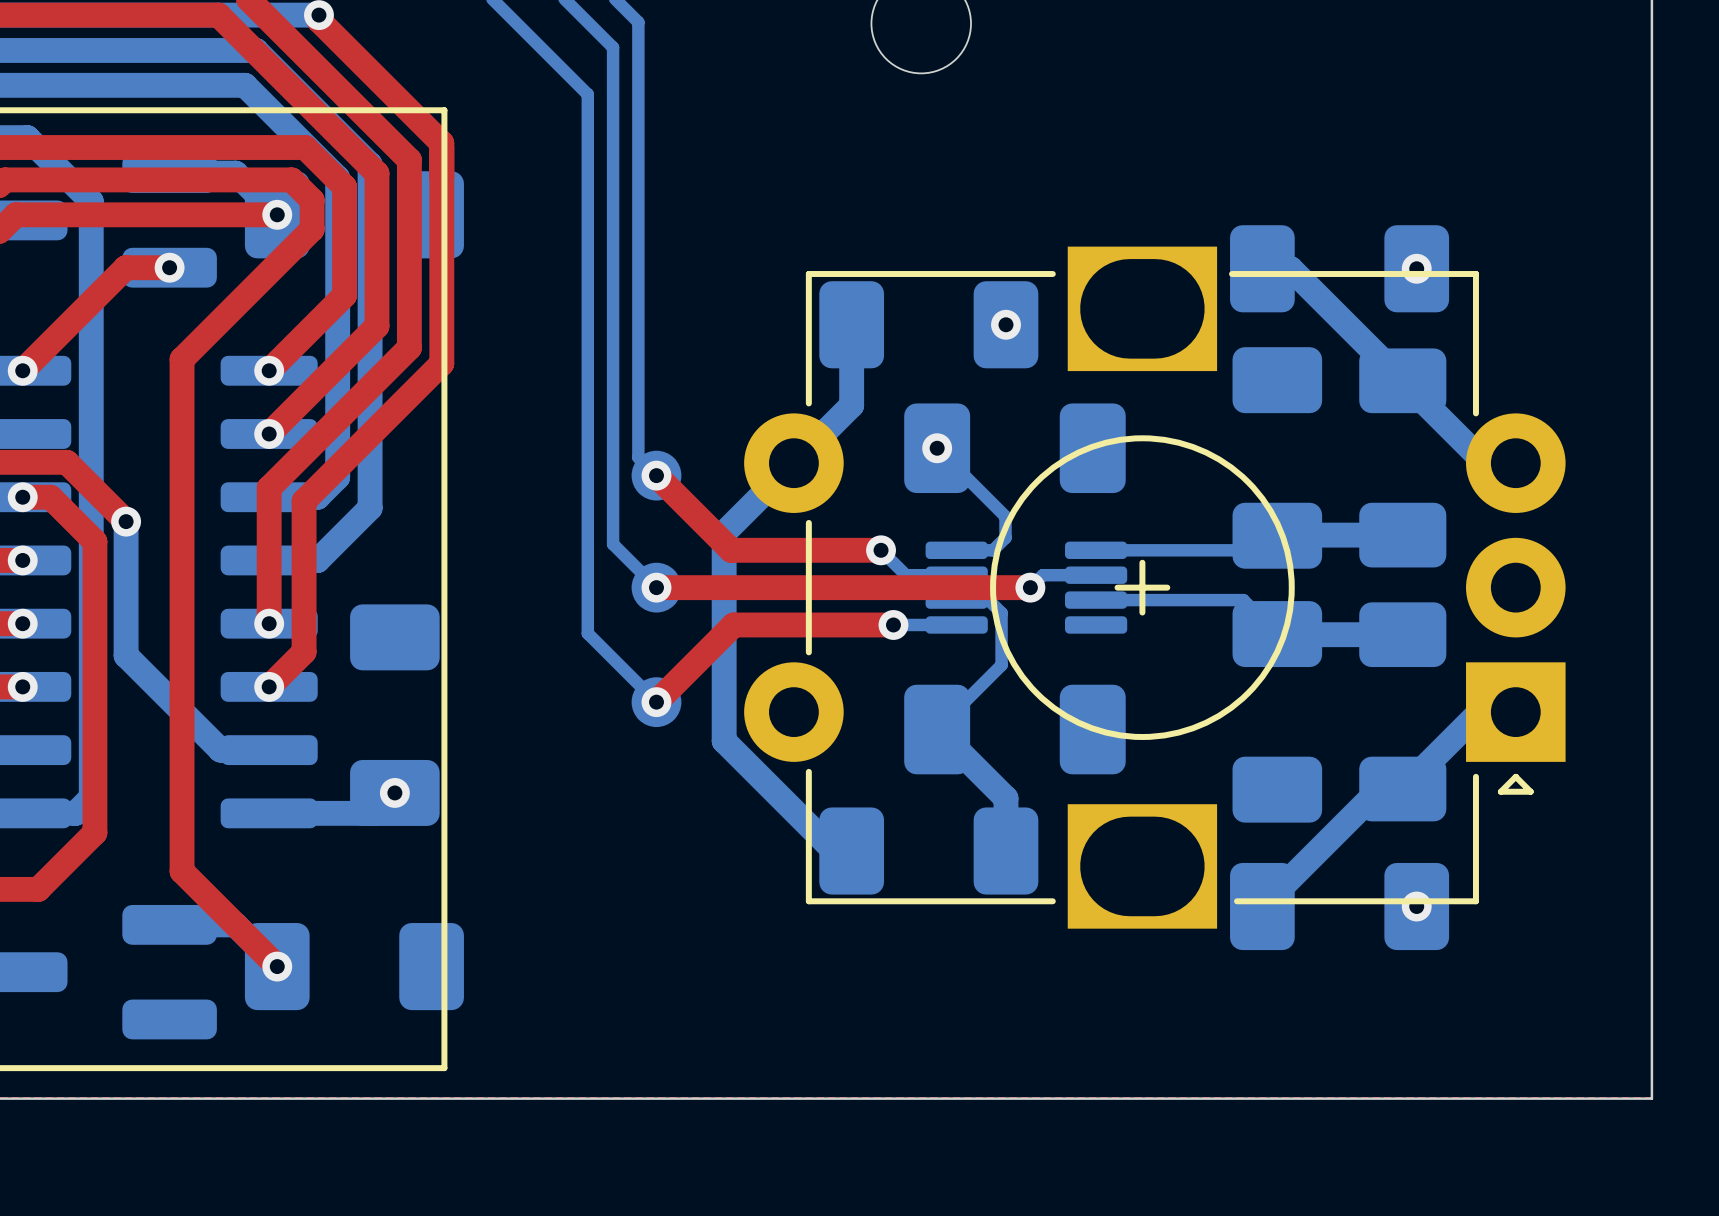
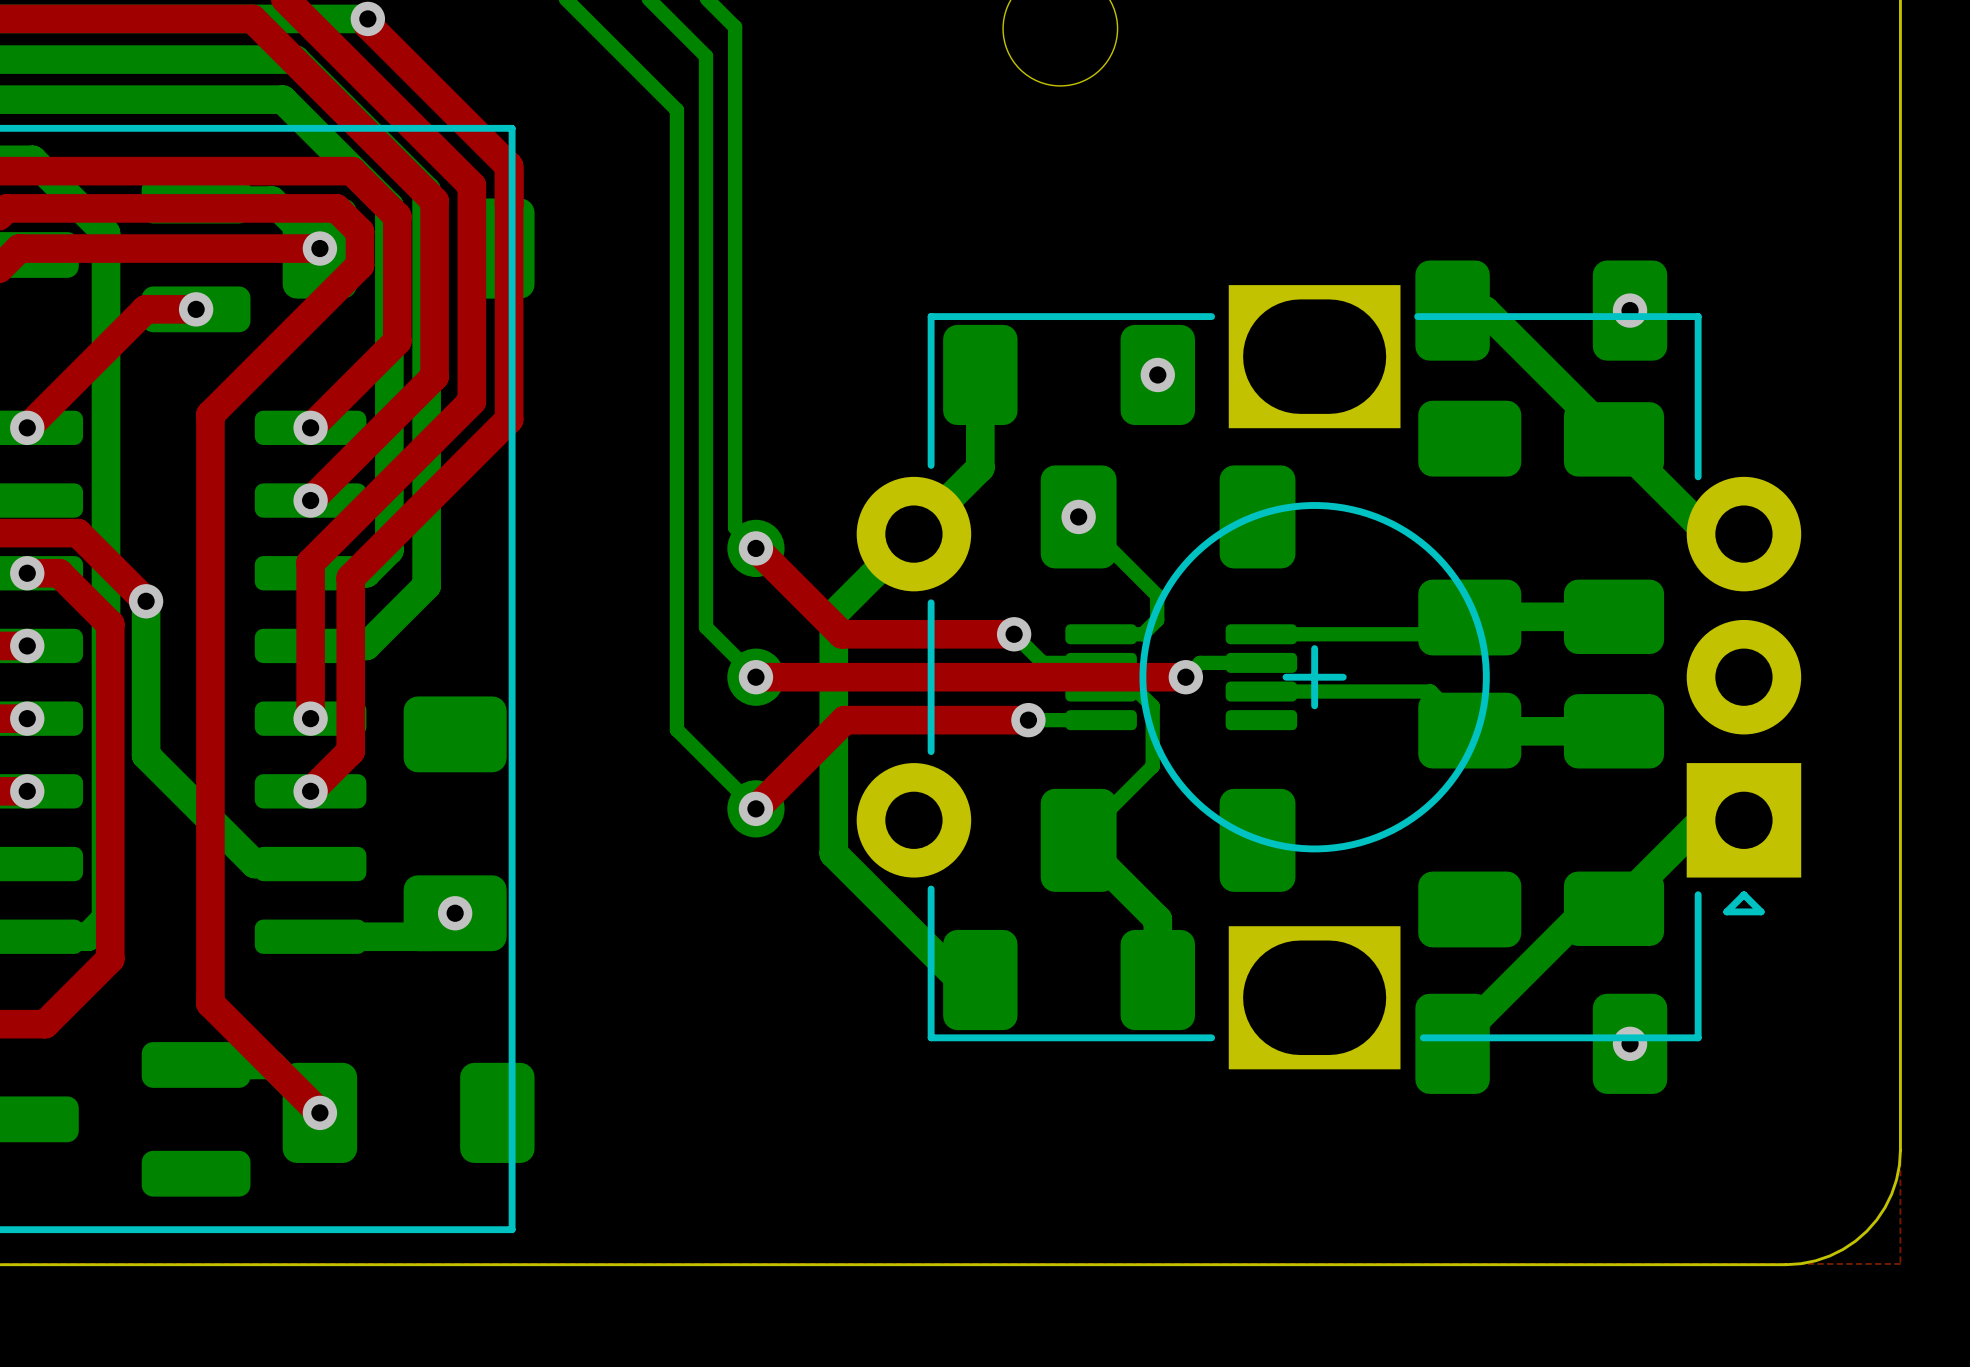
board edge: (1651, 999) (1651, 1098) (1551, 1098) -> (1900, 1150) (1899, 1165) (1891, 1194) (1876, 1219) (1866, 1231) (1843, 1249) (1829, 1255) (1815, 1260) (1785, 1264)

